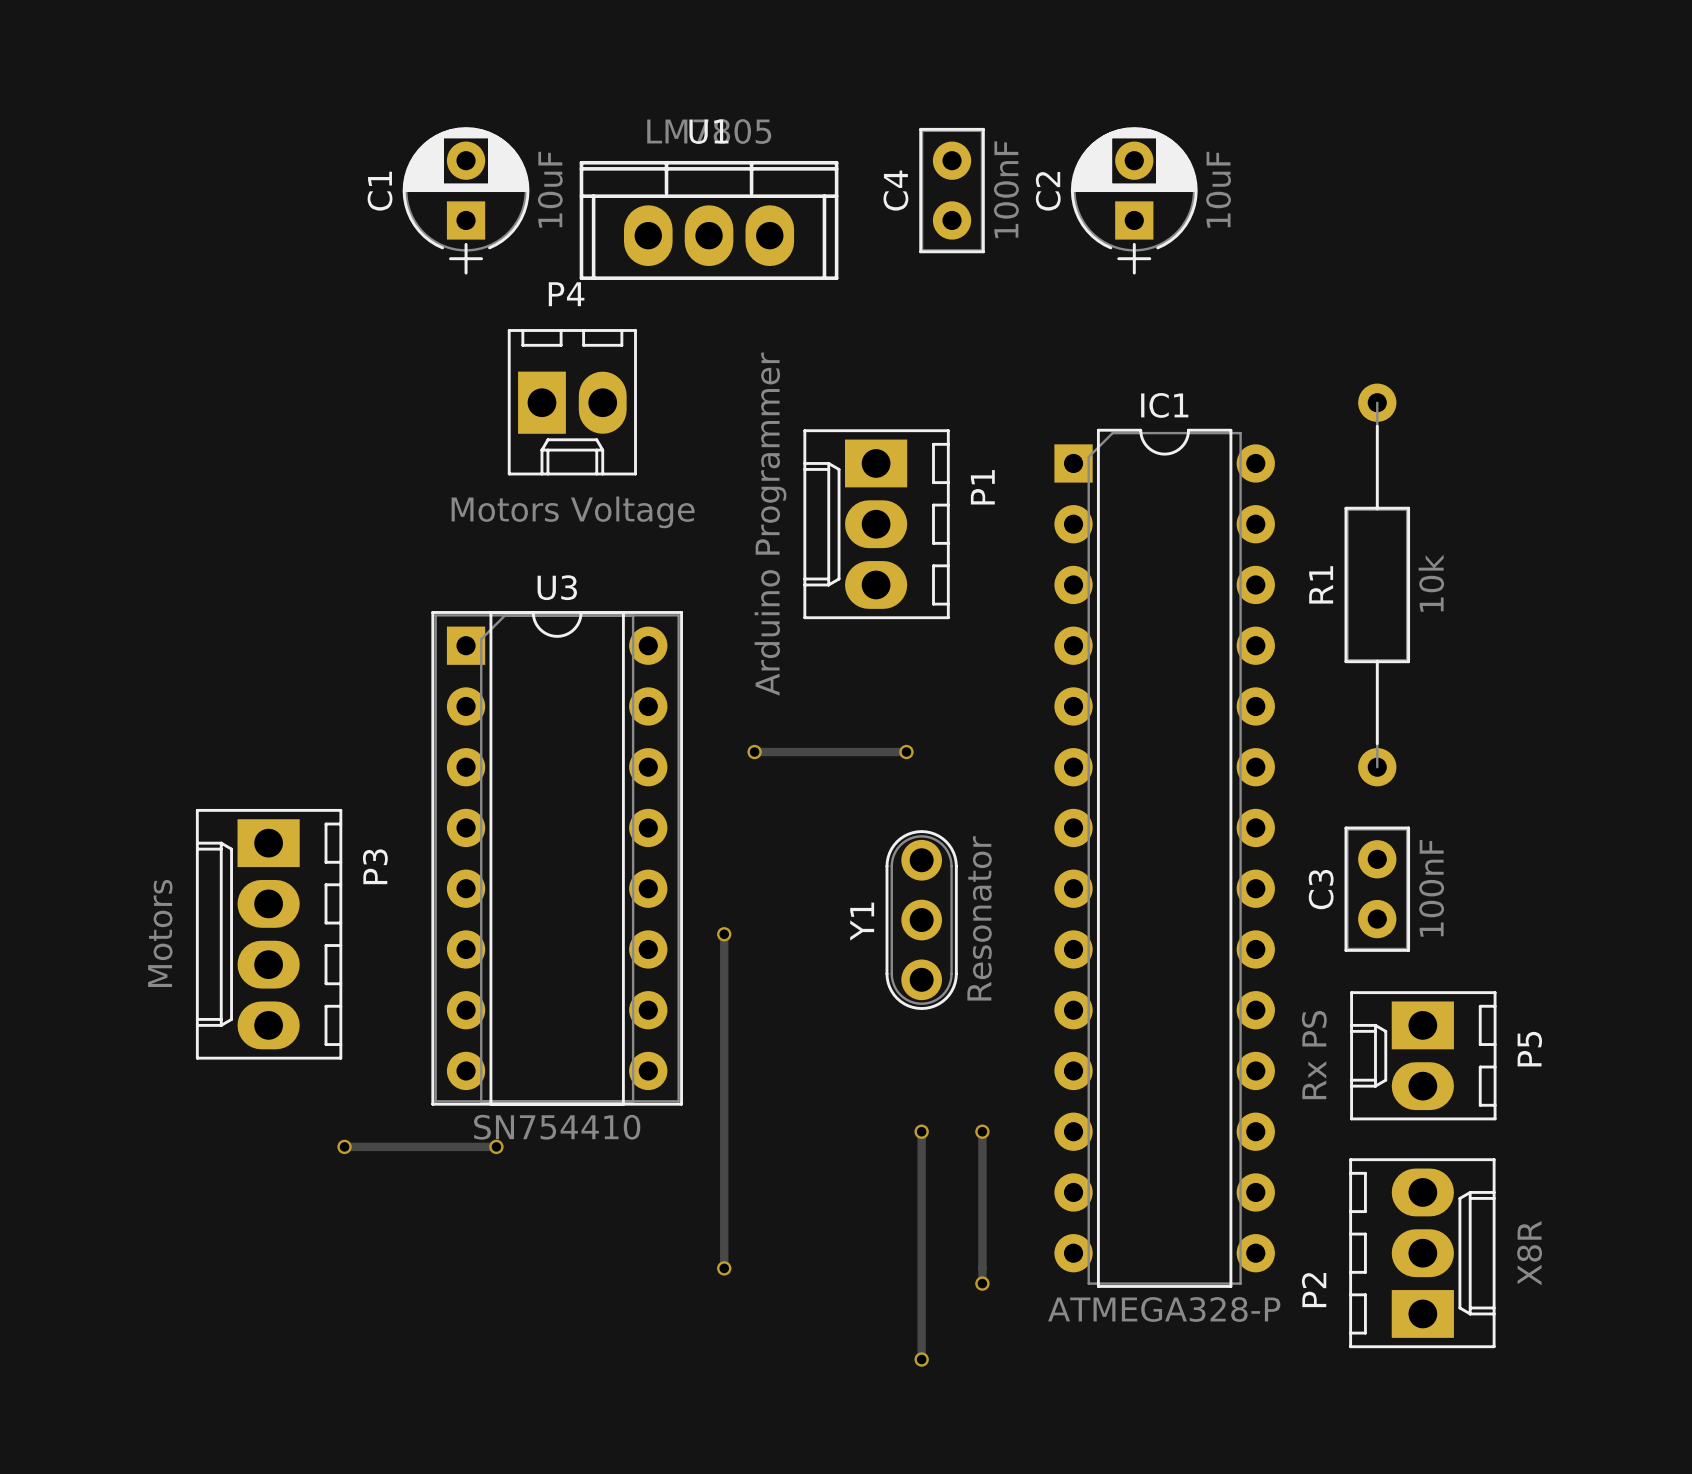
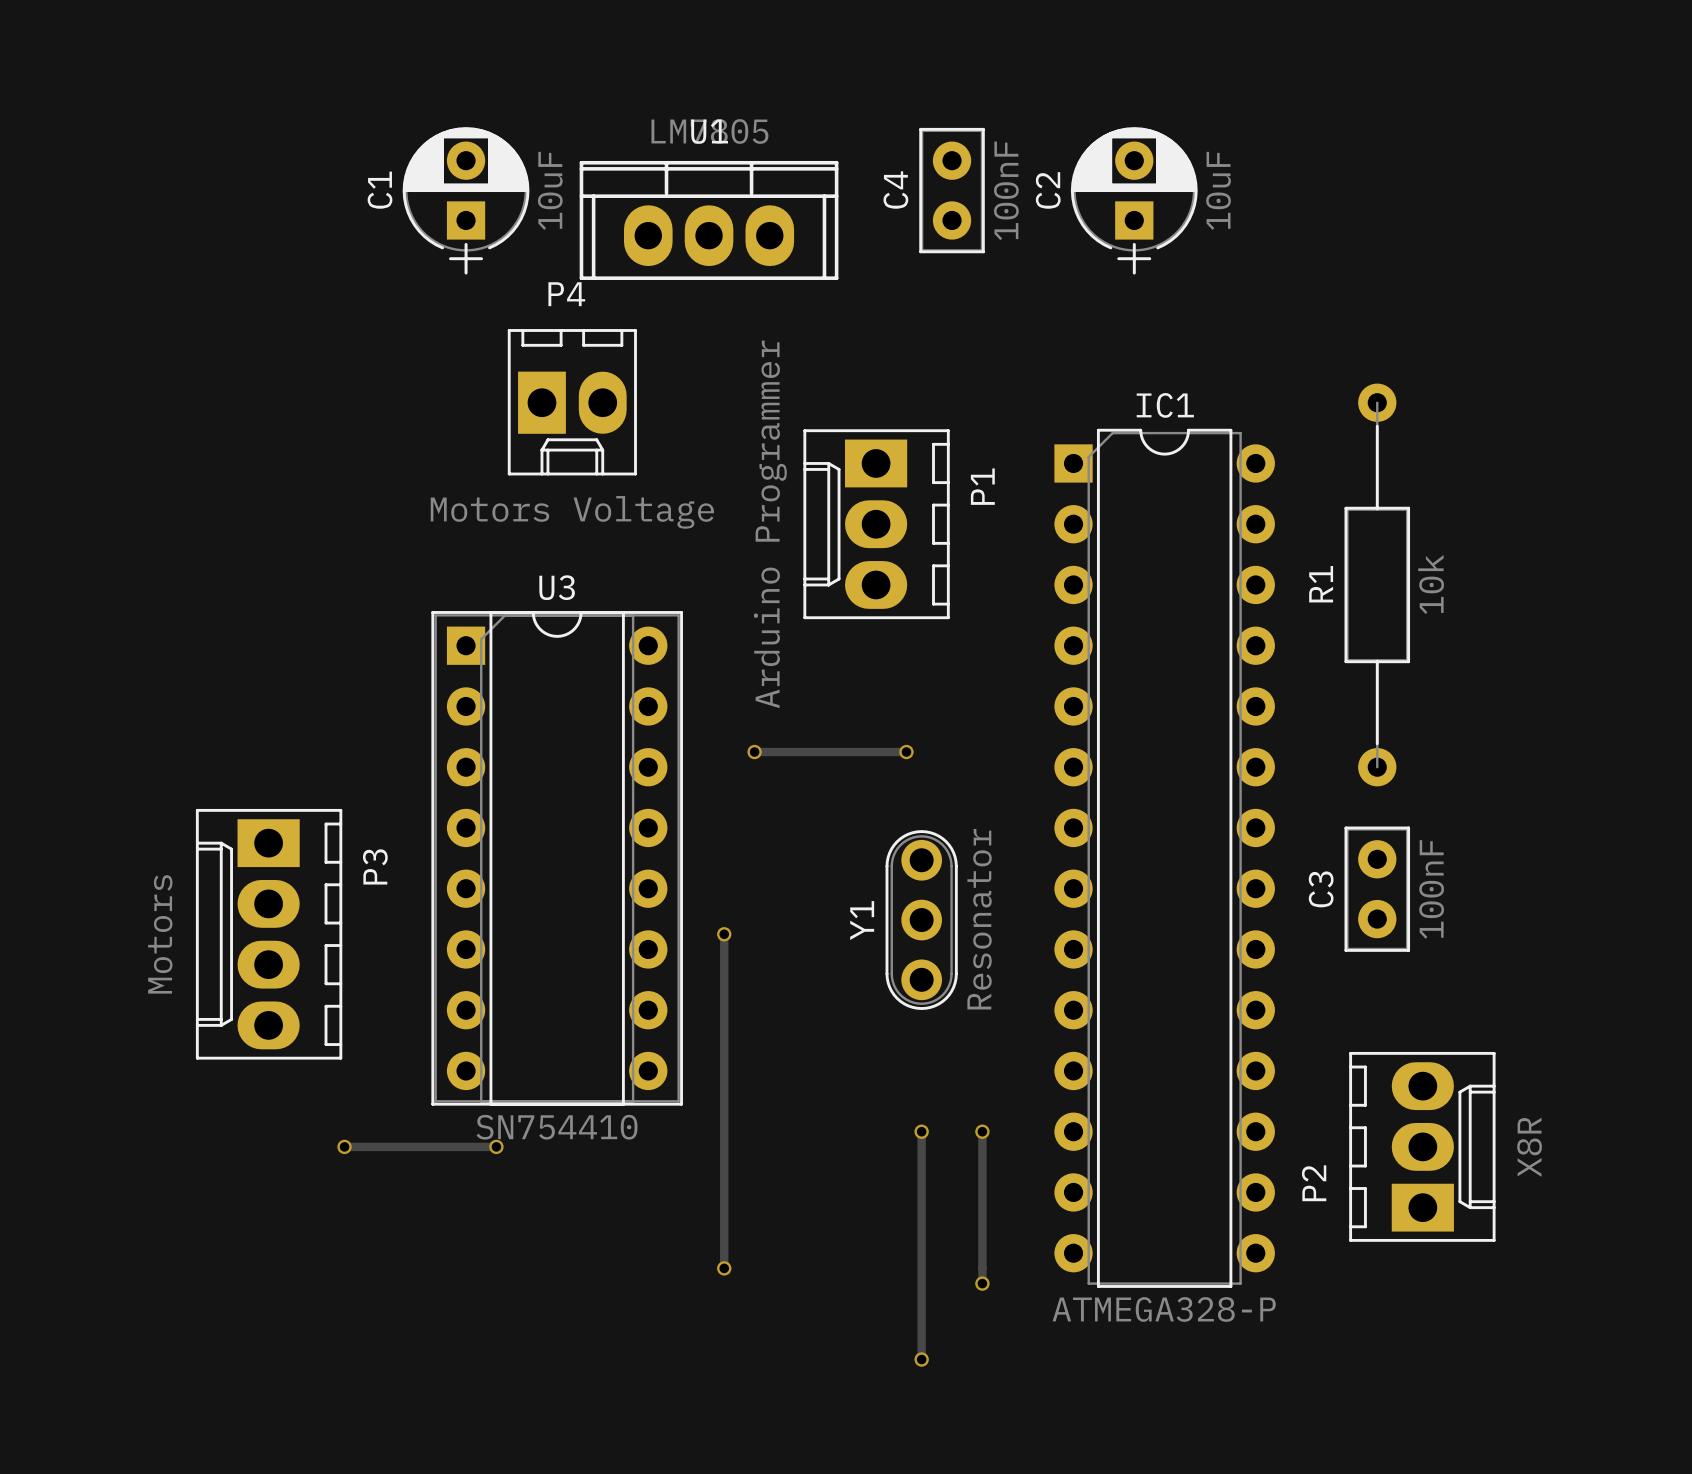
P5: Rx PS (1423, 1055) -> none
P2 position: (1422, 1253) -> (1422, 1146)

